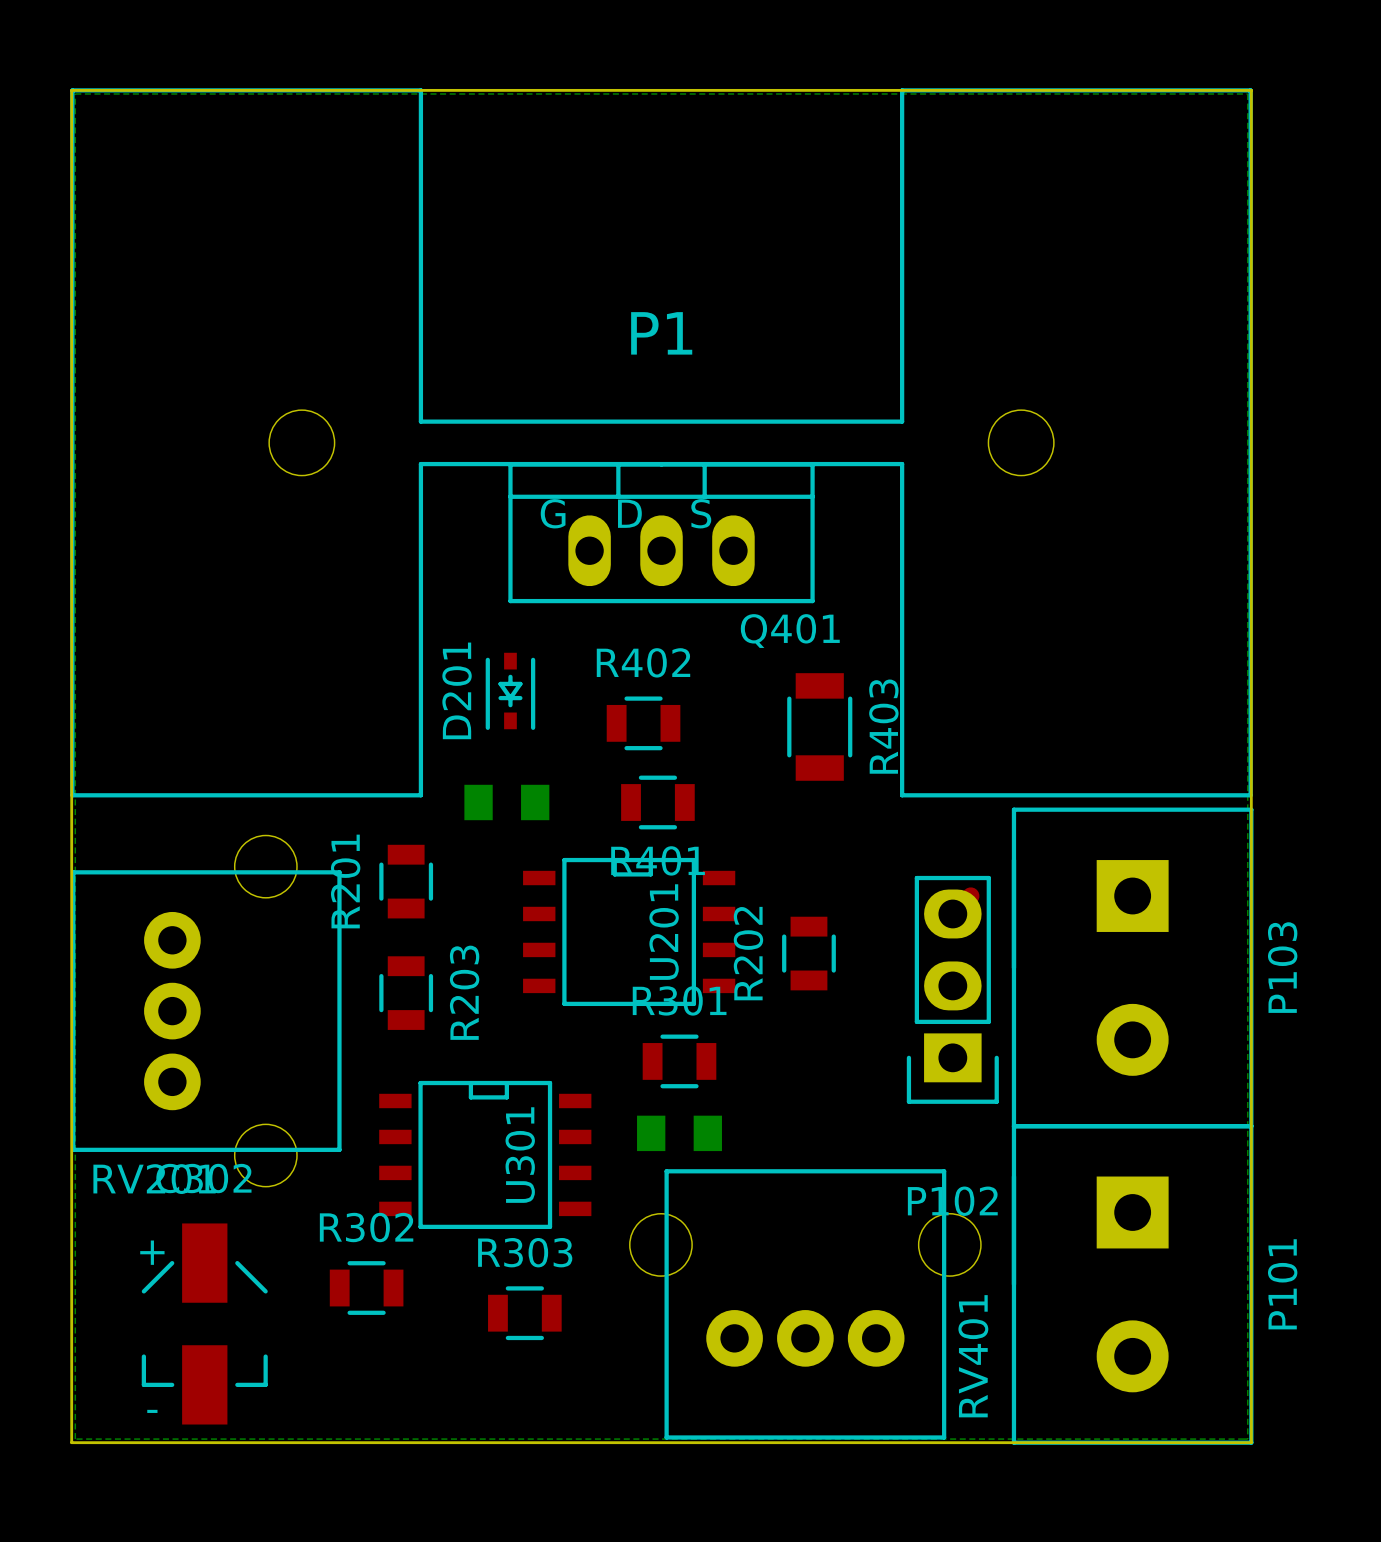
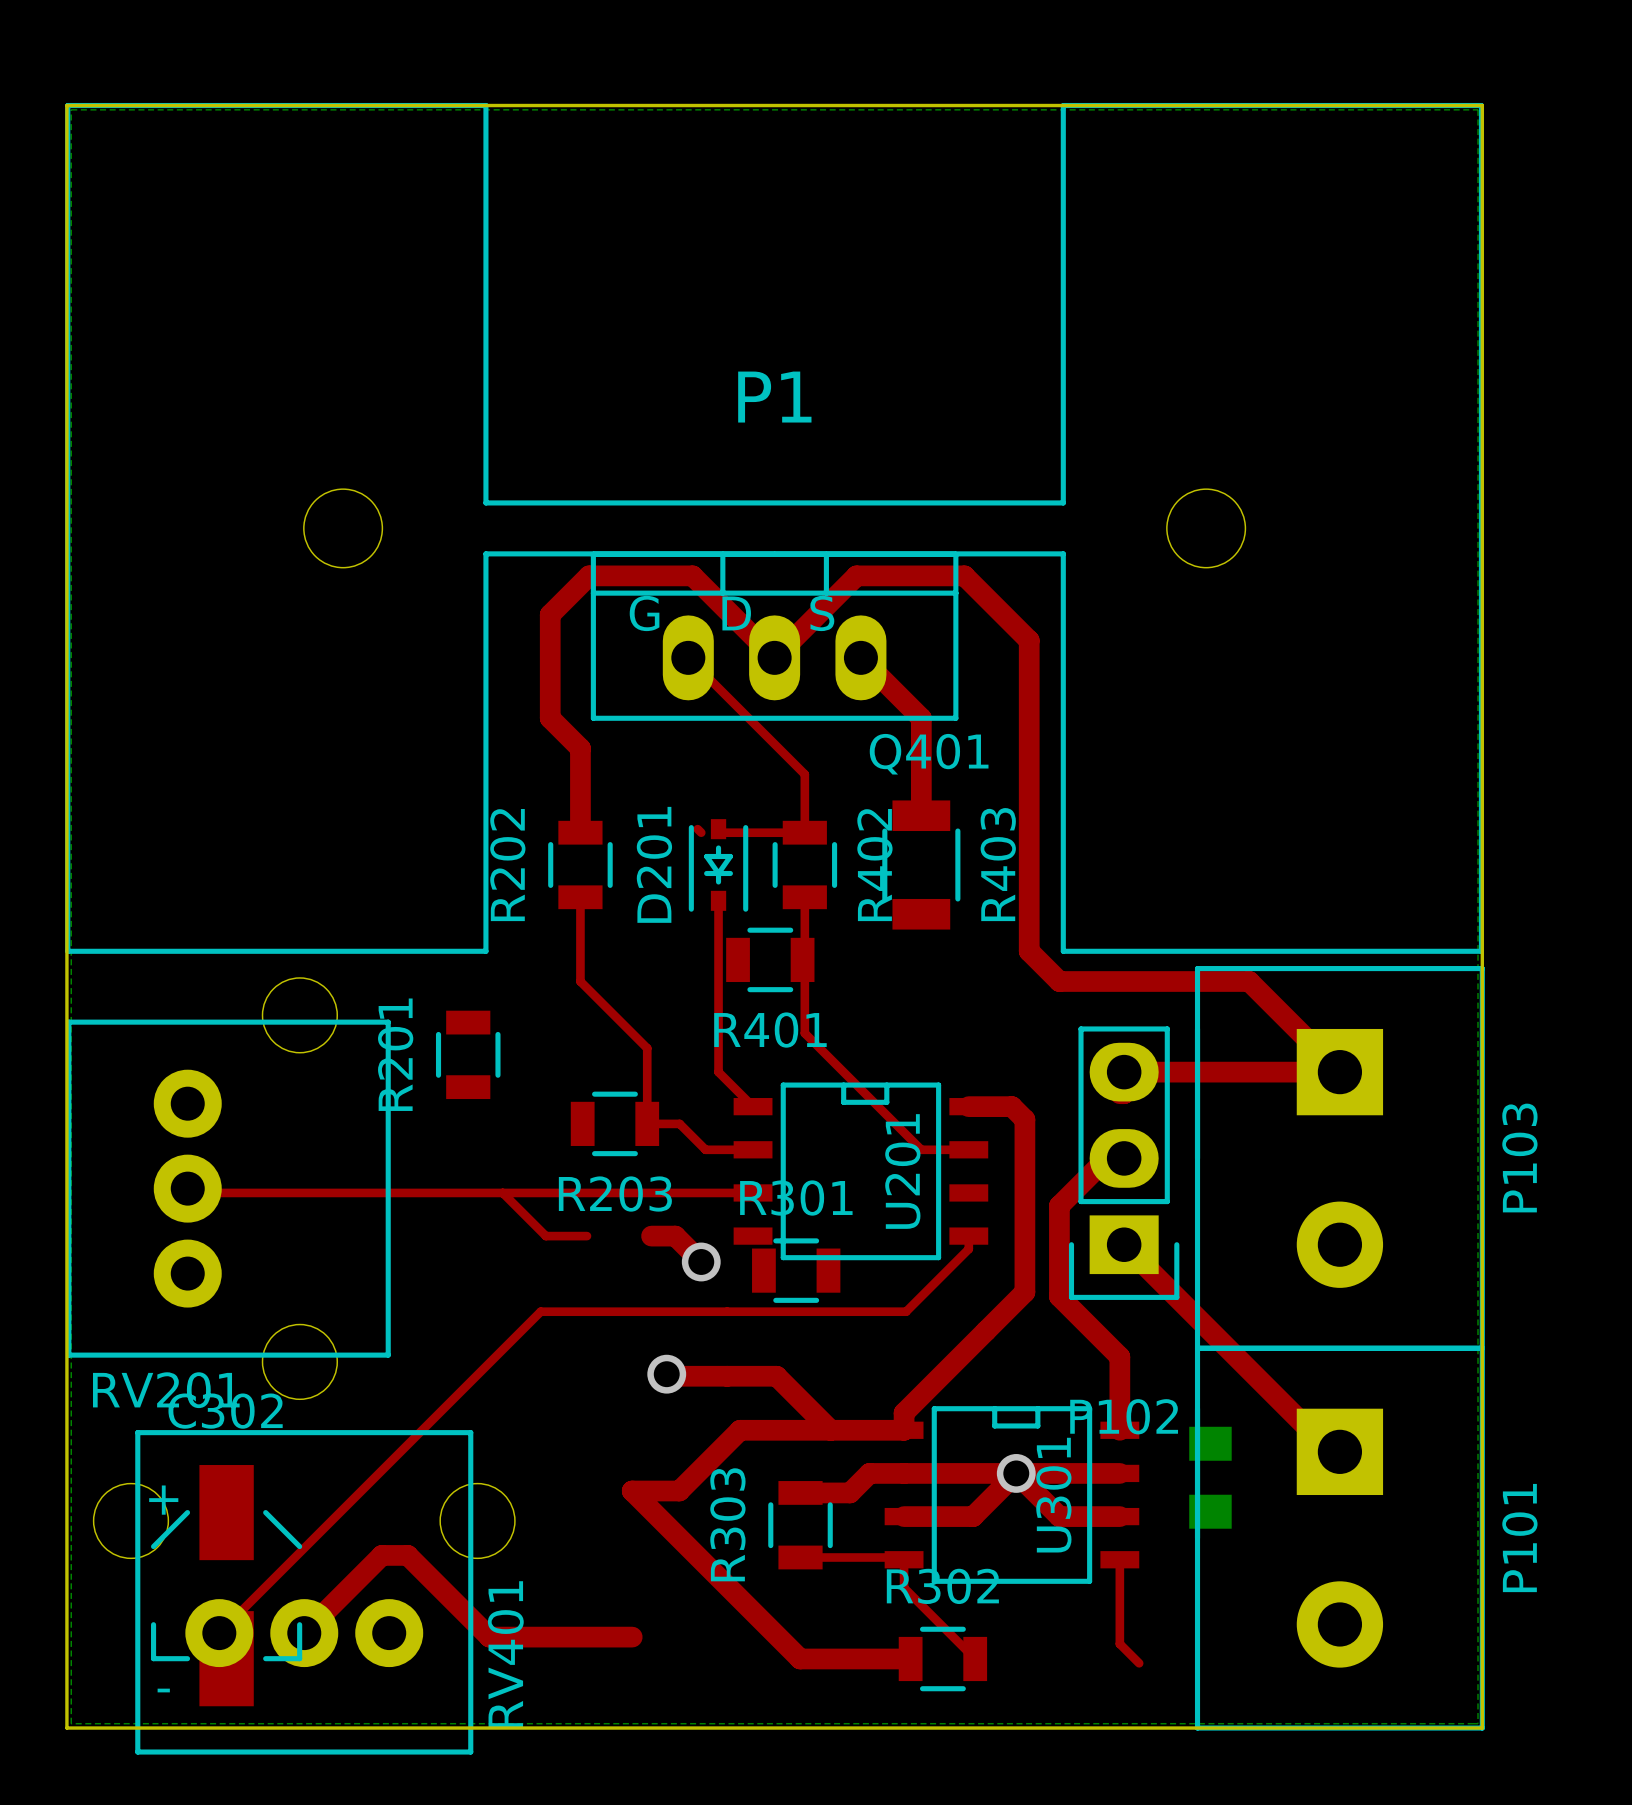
top track: none -> (688, 657) (804, 774) (804, 832) (722, 832) (718, 829)
top track: none -> (860, 657) (921, 718) (921, 815)
D201 position: (510, 691) -> (718, 865)
top track: none -> (697, 829) (701, 832)
top track: none -> (580, 832) (580, 748) (550, 718) (550, 614) (589, 575) (692, 575) (774, 657) (856, 575) (964, 575) (1029, 640) (1029, 951) (1059, 981) (1249, 981) (1339, 1072) (1124, 1072)
R402 rotation: 0° (643, 723) -> 90° clockwise (804, 864)
R403 position: (819, 726) -> (921, 864)
top track: none -> (580, 897) (580, 981) (647, 1048) (647, 1123) (679, 1123) (705, 1149) (753, 1149)
top track: none -> (804, 897) (804, 1033) (921, 1149) (968, 1149)
top track: none -> (718, 900) (718, 1072) (753, 1106)
part: (506, 802) -> none
top track: none -> (968, 1106) (1011, 1106) (1024, 1119) (1024, 1292) (904, 1413) (904, 1430) (740, 1430) (679, 1491) (632, 1491) (800, 1658) (910, 1658)
U201 position: (629, 931) -> (860, 1171)
R202 position: (808, 953) -> (580, 864)
top track: none -> (1106, 1158) (1059, 1205) (1059, 1296) (1119, 1356) (1119, 1430)
P102 position: (952, 989) -> (1124, 1163)
top track: none -> (187, 1188) (192, 1192) (753, 1192)
R203 rotation: 0° (406, 993) -> 90° clockwise (614, 1123)
R203 position: (406, 993) -> (614, 1123)
top track: none -> (502, 1192) (545, 1236) (587, 1236)
RV201 position: (206, 1011) -> (228, 1188)
top track: none -> (651, 1236) (675, 1236) (701, 1261)
top track: none -> (968, 1236) (968, 1249) (906, 1311) (540, 1311) (219, 1633)
top track: none -> (1124, 1244) (1331, 1451) (1339, 1451)
via: none -> (701, 1261)
part: (679, 1133) -> none
top track: none -> (666, 1374) (668, 1376) (776, 1376) (830, 1430)
via: none -> (666, 1374)
U301 position: (485, 1154) -> (1011, 1495)
via: none -> (1016, 1473)
top track: none -> (1119, 1473) (869, 1473) (850, 1492) (800, 1492)
part: none -> (1210, 1477)
R303 name position: R303 (525, 1252) -> R303 (727, 1524)
top track: none -> (904, 1516) (973, 1516) (1016, 1473) (1059, 1516) (1119, 1516)
R302 position: (366, 1288) -> (942, 1658)
top track: none -> (800, 1557) (901, 1557) (904, 1559) (904, 1587) (975, 1658)
top track: none -> (1119, 1559) (1119, 1643) (1139, 1663)
RV401 position: (805, 1304) -> (304, 1592)
R303 rotation: 0° (524, 1313) -> 90° clockwise (800, 1525)
R303 position: (524, 1313) -> (800, 1525)
top track: none -> (304, 1633) (381, 1555) (407, 1555) (489, 1637) (632, 1637)

